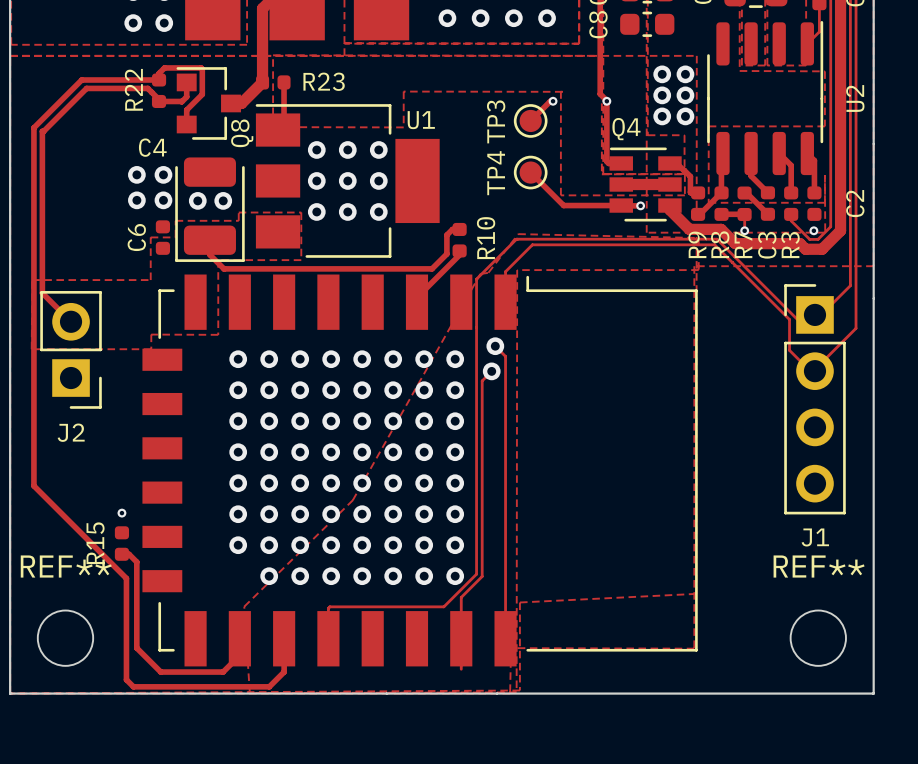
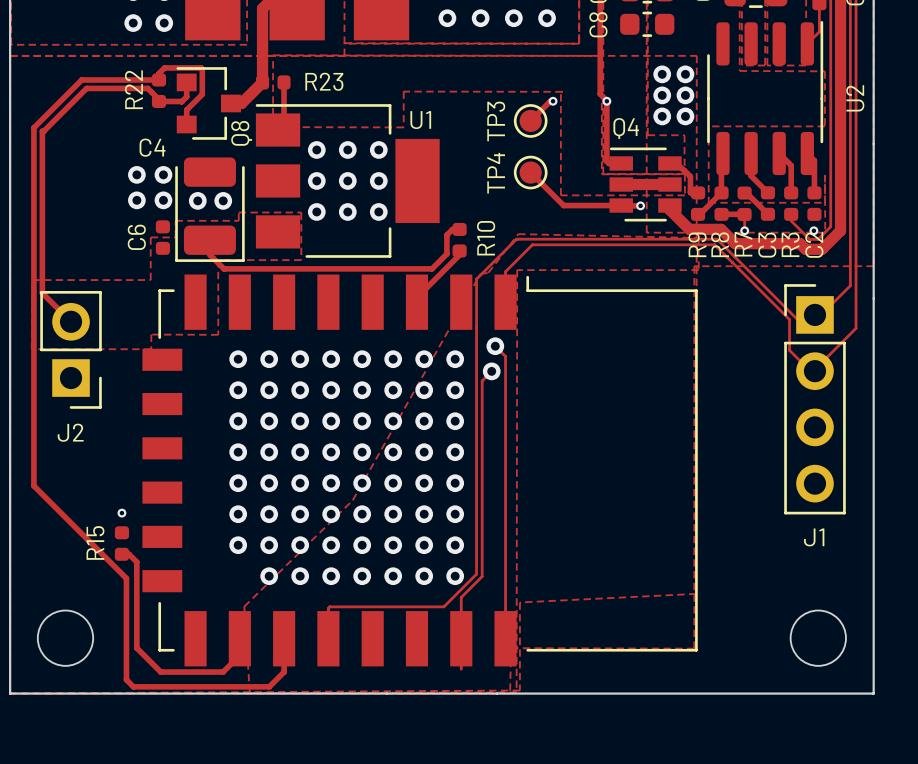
C2 name position: C2 (855, 203) -> C2 (814, 245)
REF** name: REF** (66, 566) -> none
REF** name: REF** (819, 566) -> none

